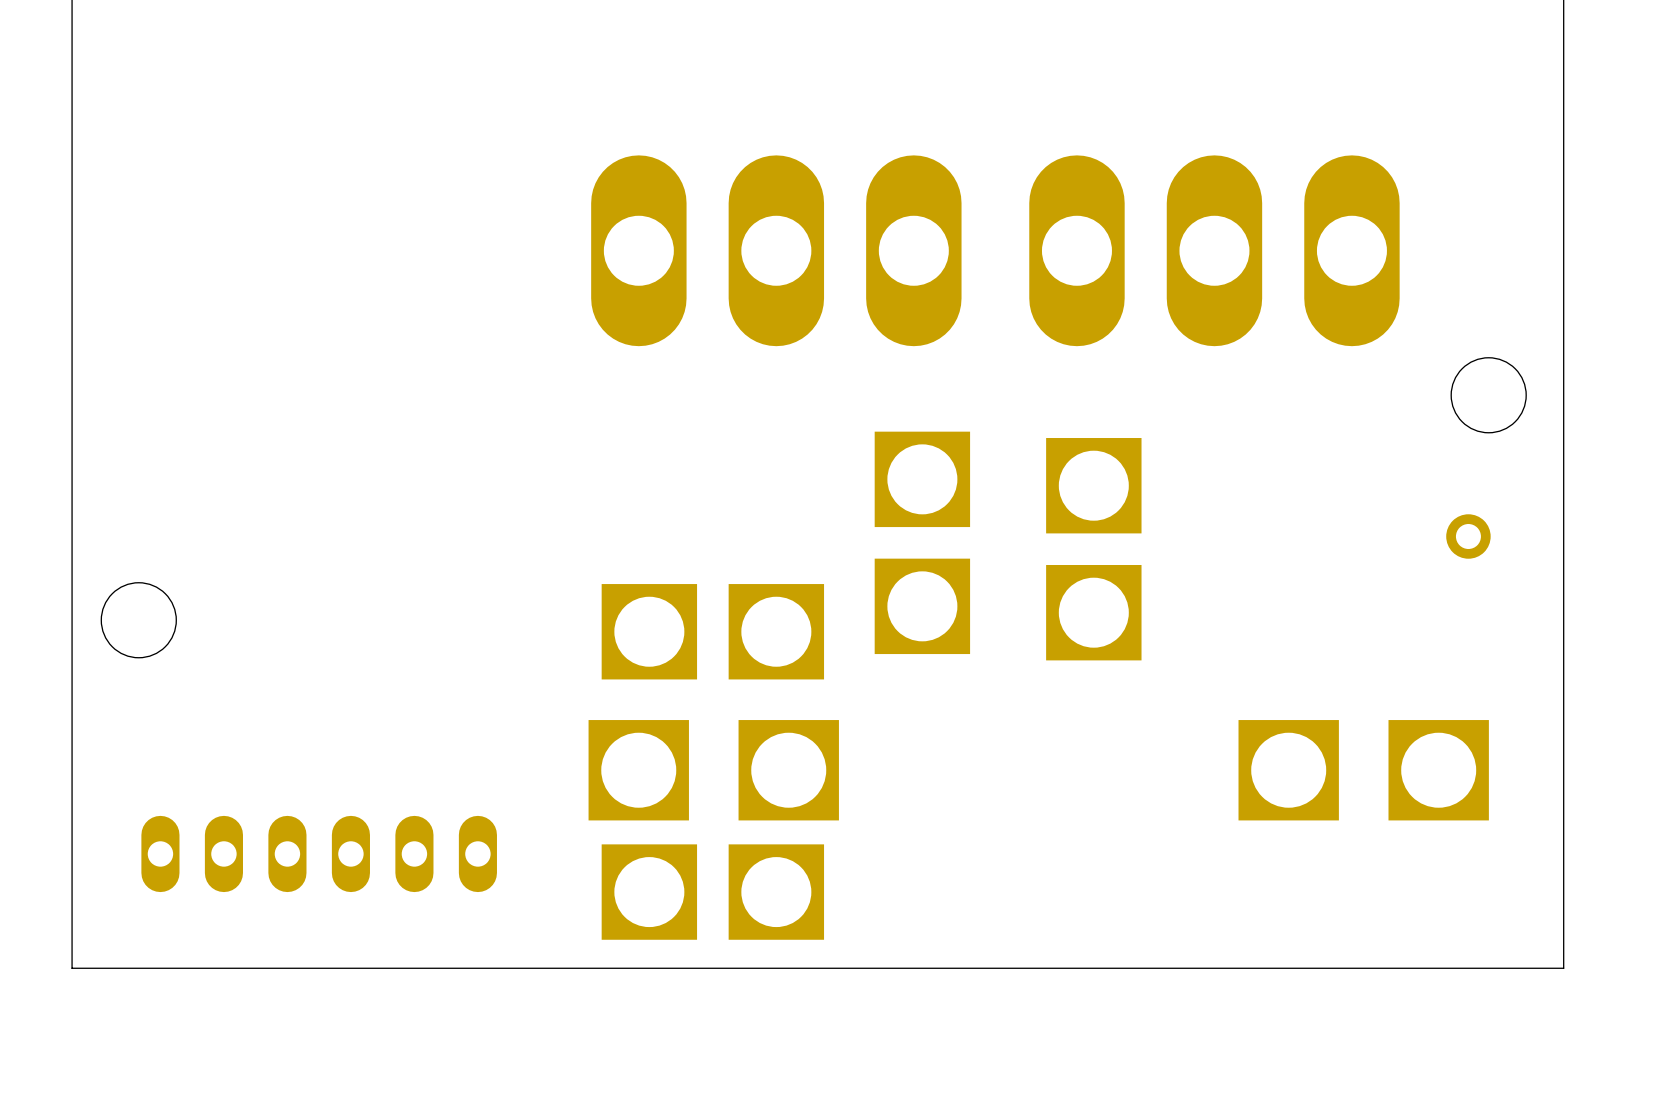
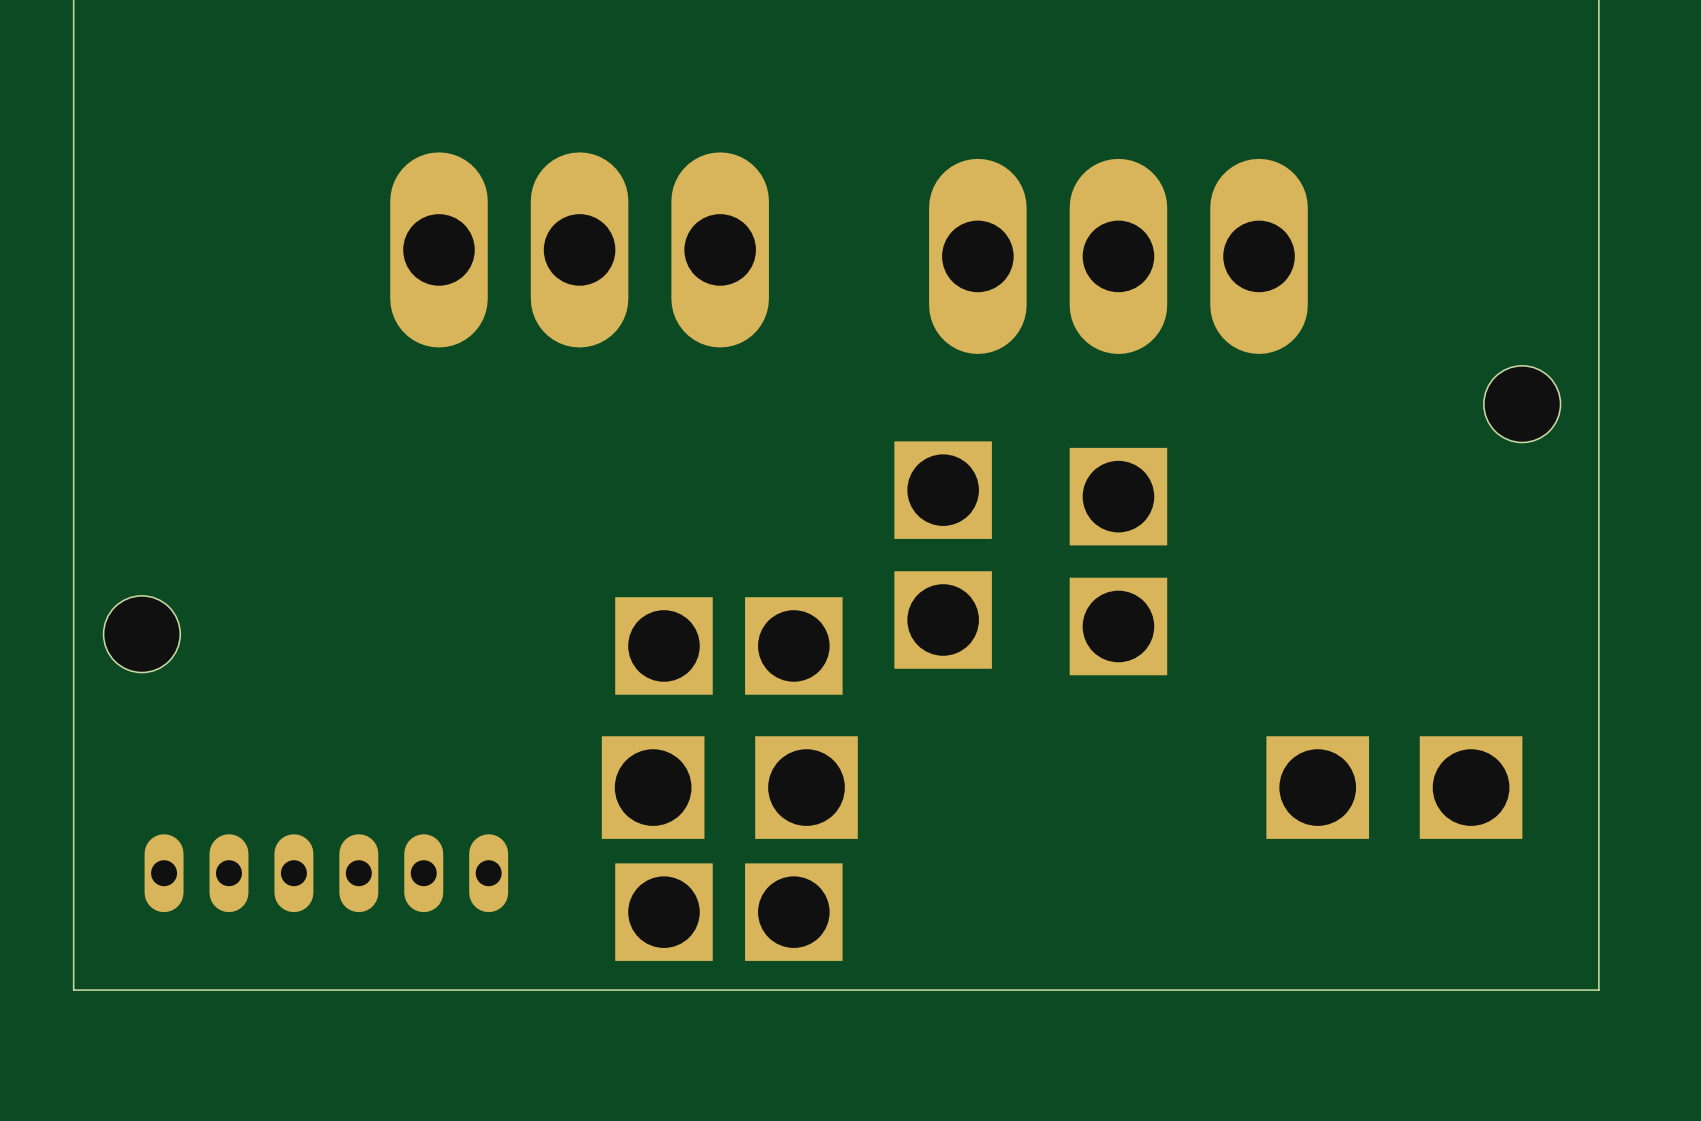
part: none -> (579, 249)
part: (776, 250) -> none
part position: (1214, 250) -> (1118, 256)
part: (1468, 536) -> none

